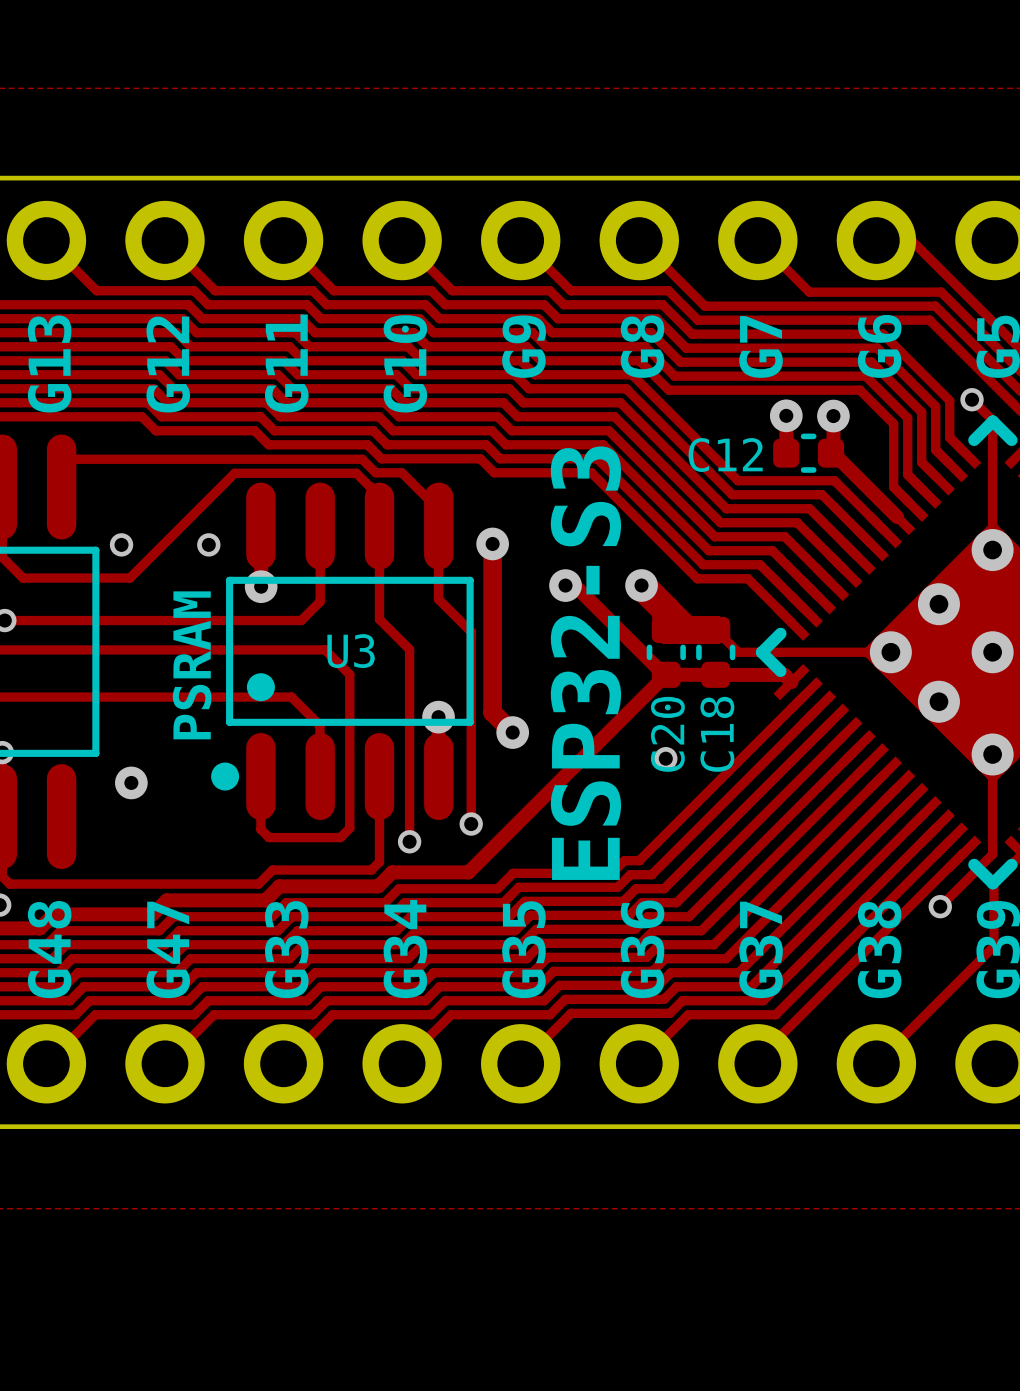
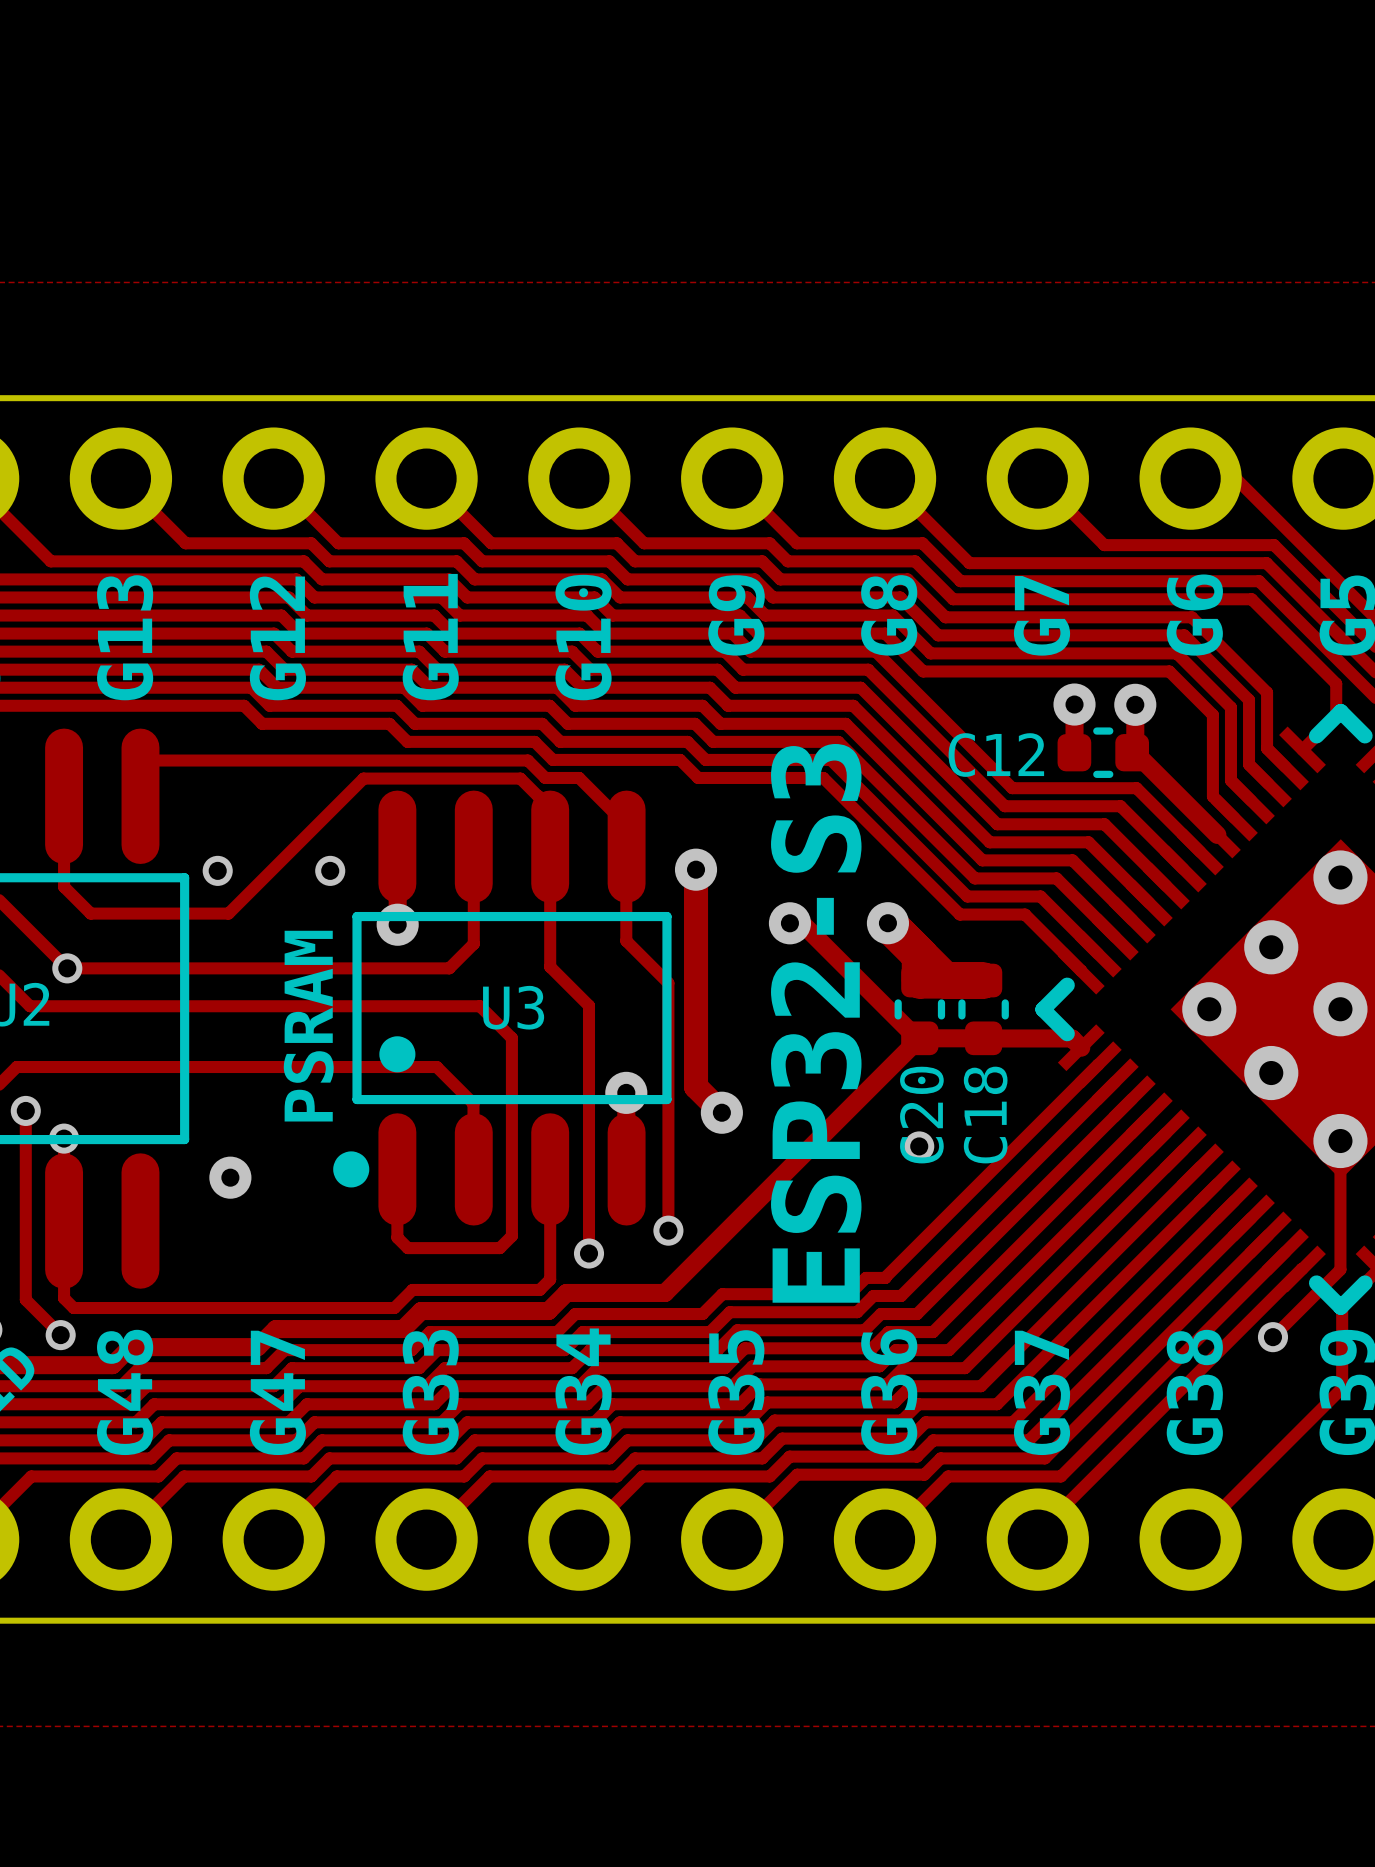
track: (883, 334) (949, 400) (949, 437) (963, 451) -> (1199, 599) (1251, 599) (1336, 683) (1336, 716) (1302, 749)
track: (972, 399) (992, 420) (992, 550) -> none
via: (972, 399) -> none
track: (715, 629) (738, 652) (890, 652) -> none

